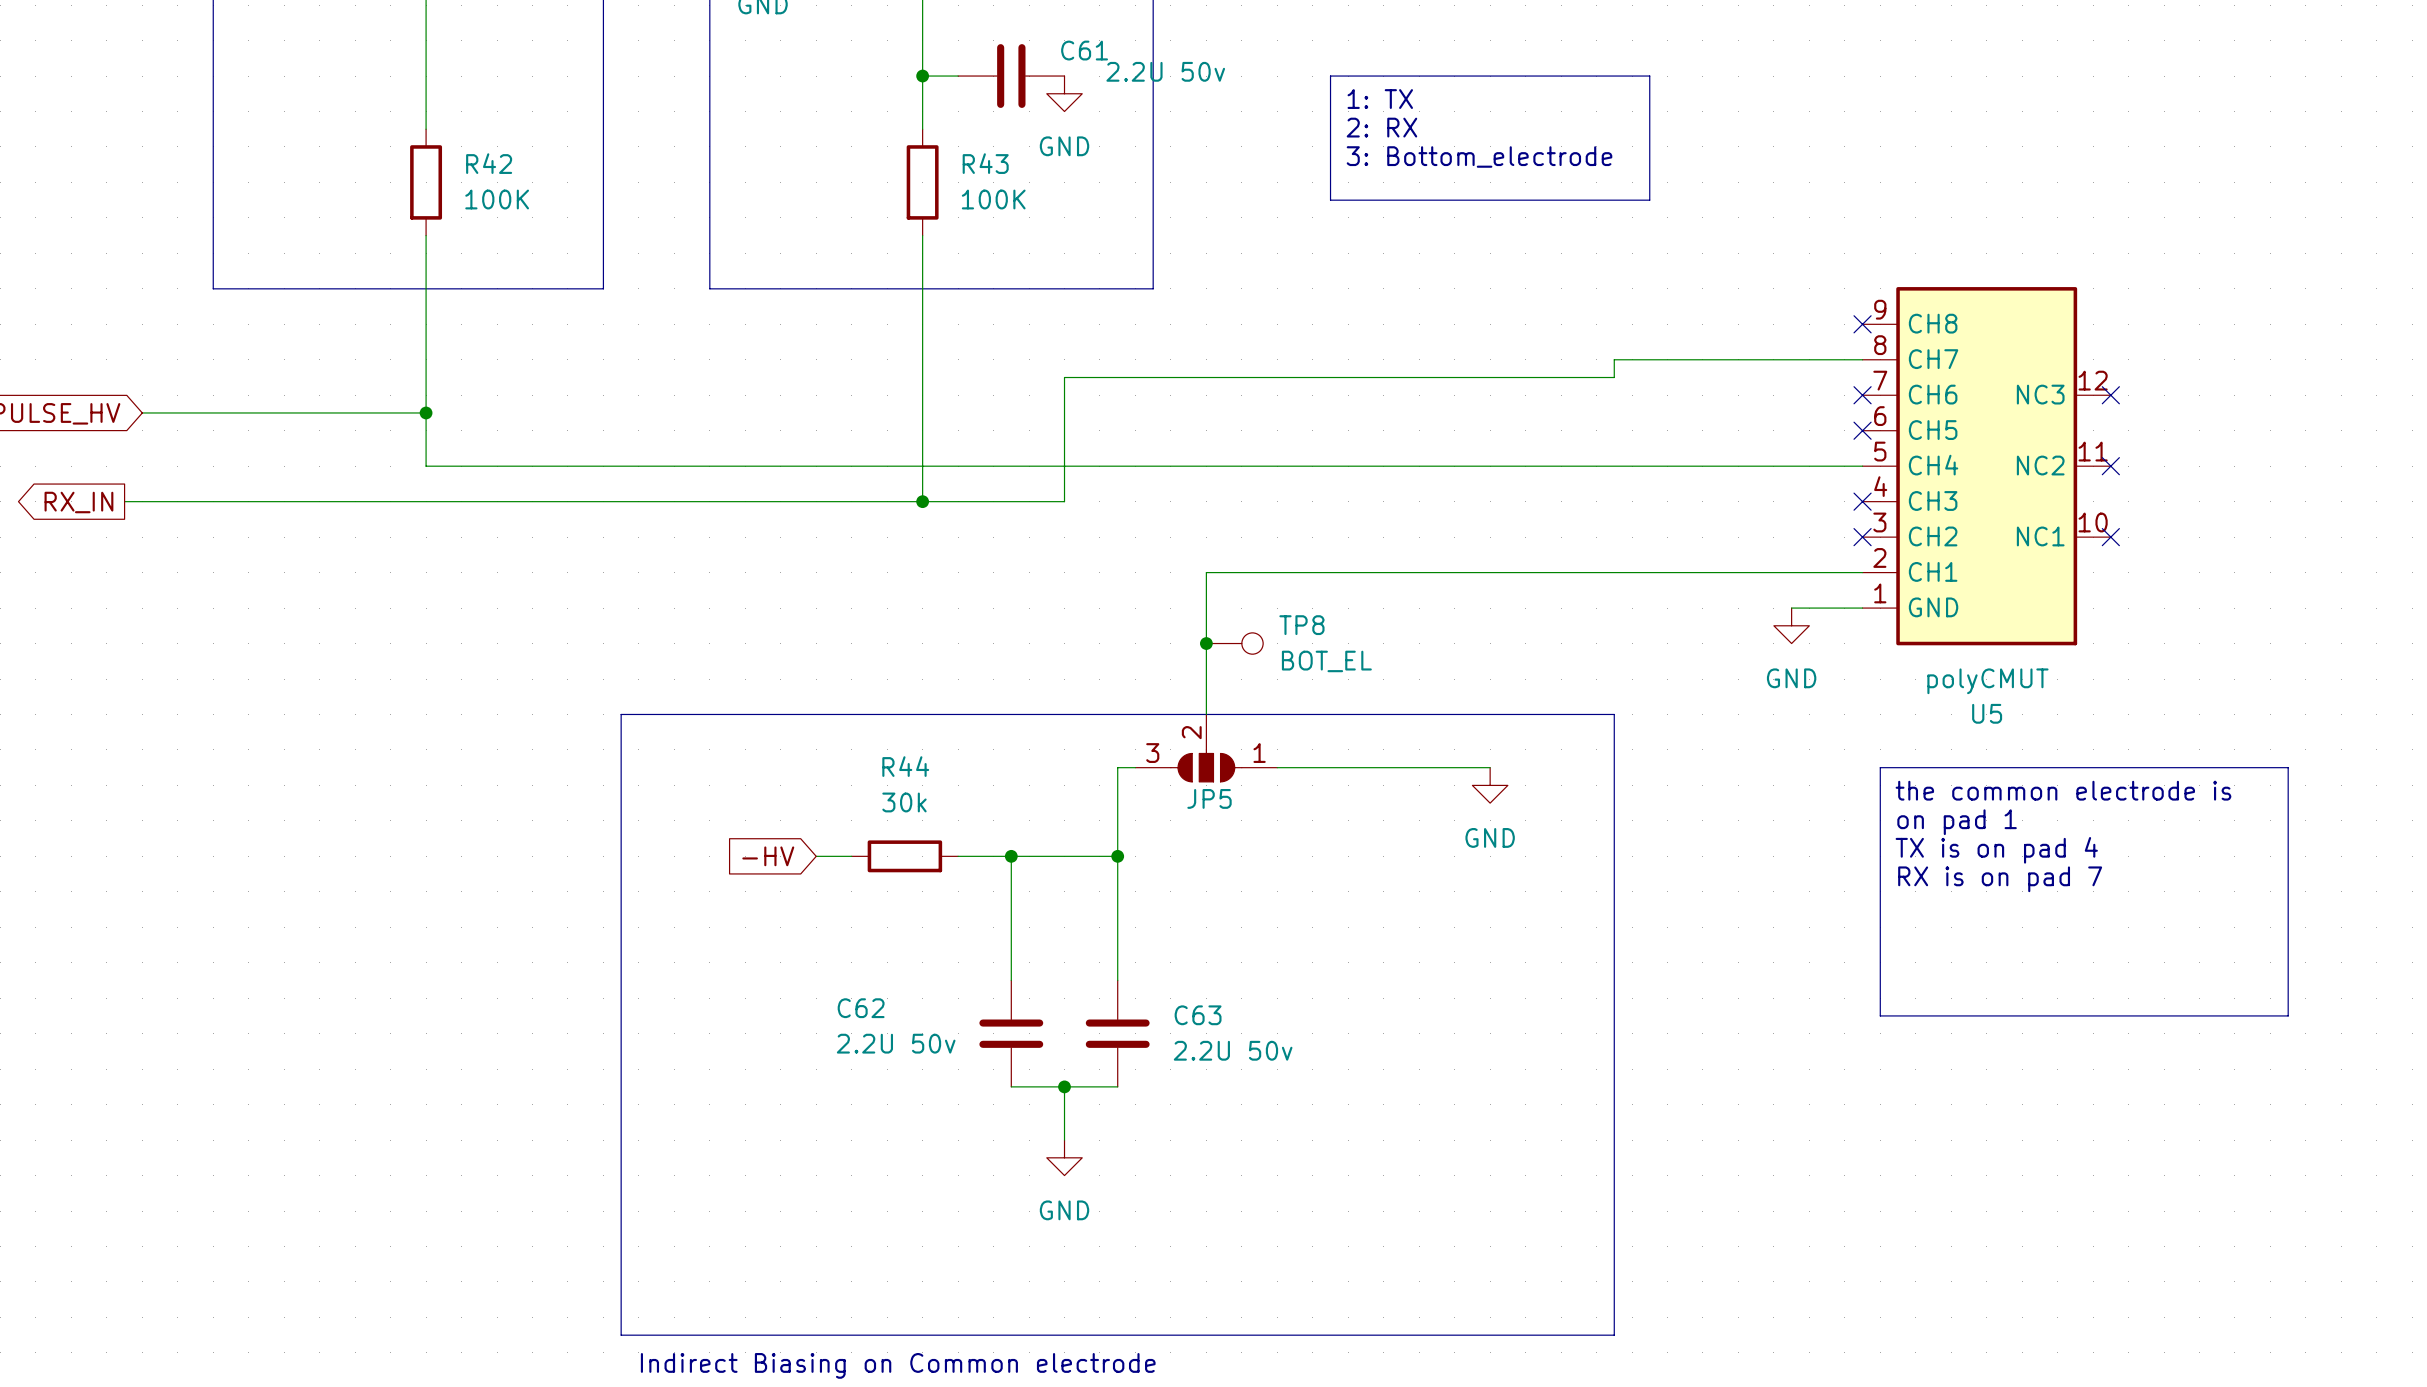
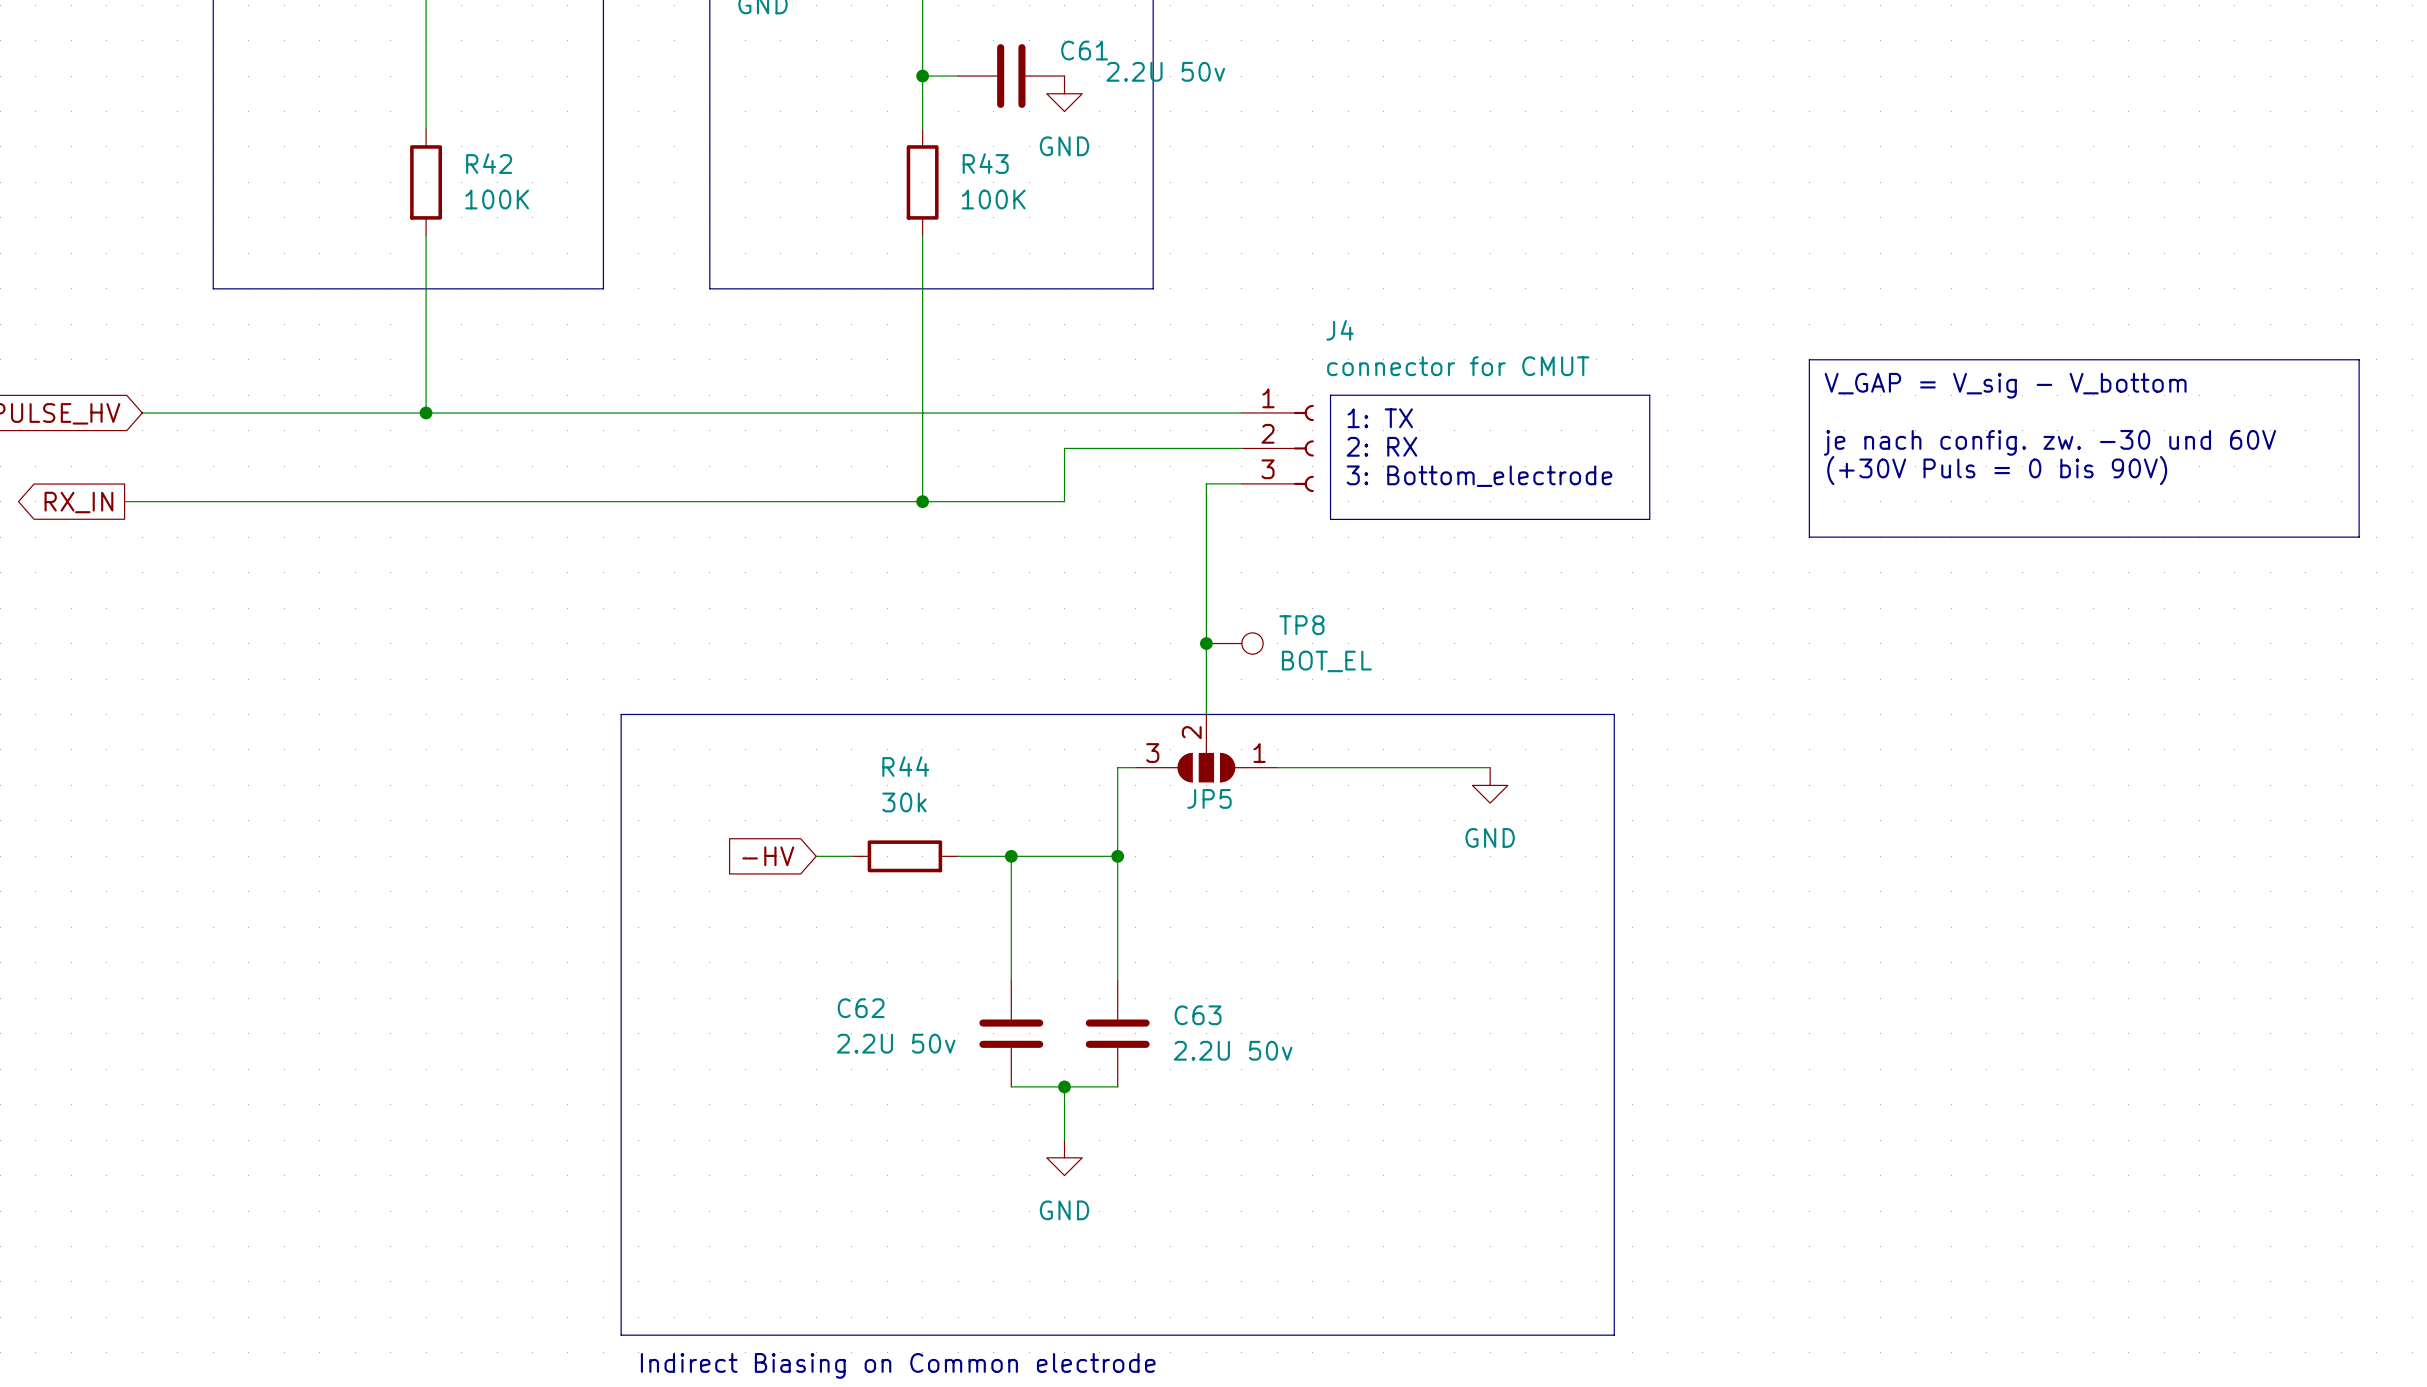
line: (1330, 76) (1649, 76) (1649, 200) (1330, 200) (1330, 76) -> (1330, 395) (1649, 395) (1649, 519) (1330, 519) (1330, 395)
text position: 1: TX (1380, 99) -> 1: TX (1380, 418)
text position: 2: RX (1381, 127) -> 2: RX (1381, 446)
text position: 3: Bottom_electrode (1479, 156) -> 3: Bottom_electrode (1479, 476)
no-connect mark: (1862, 324) -> none
line: none -> (1809, 359) (2359, 359) (2359, 537) (1809, 537) (1809, 359)
wire: (1862, 359) (1614, 359) (1614, 377) (1064, 377) (1064, 448) -> (1241, 448) (1064, 448)
text: none -> V_GAP = V_sig - V_bottom (2005, 385)
no-connect mark: (1862, 395) -> none
no-connect mark: (2110, 395) -> none
wire: (426, 412) (426, 466) (1862, 466) -> (426, 412) (1241, 412)
no-connect mark: (1862, 430) -> none
text: none -> je nach config. zw. -30 und 60V (2049, 442)
J4: none -> connector for CMUT (1277, 448)
U5: polyCMUT (1986, 466) -> none
no-connect mark: (2110, 466) -> none
text: none -> (+30V Puls = 0 bis 90V) (1997, 470)
no-connect mark: (1862, 501) -> none
no-connect mark: (1862, 537) -> none
no-connect mark: (2110, 537) -> none
wire: (1206, 572) (1862, 572) -> (1206, 572) (1206, 483) (1241, 483)
wire: (1791, 608) (1862, 608) -> none
power symbol: GND (1791, 625) -> none
line: (1880, 767) (2288, 767) (2288, 1015) (1880, 1015) (1880, 767) -> none
text: the common electrode is (2063, 790) -> none
text: on pad 1 (1957, 822) -> none
text: TX is on pad 4 (1996, 850) -> none
text: RX is on pad 7 (2000, 879) -> none

